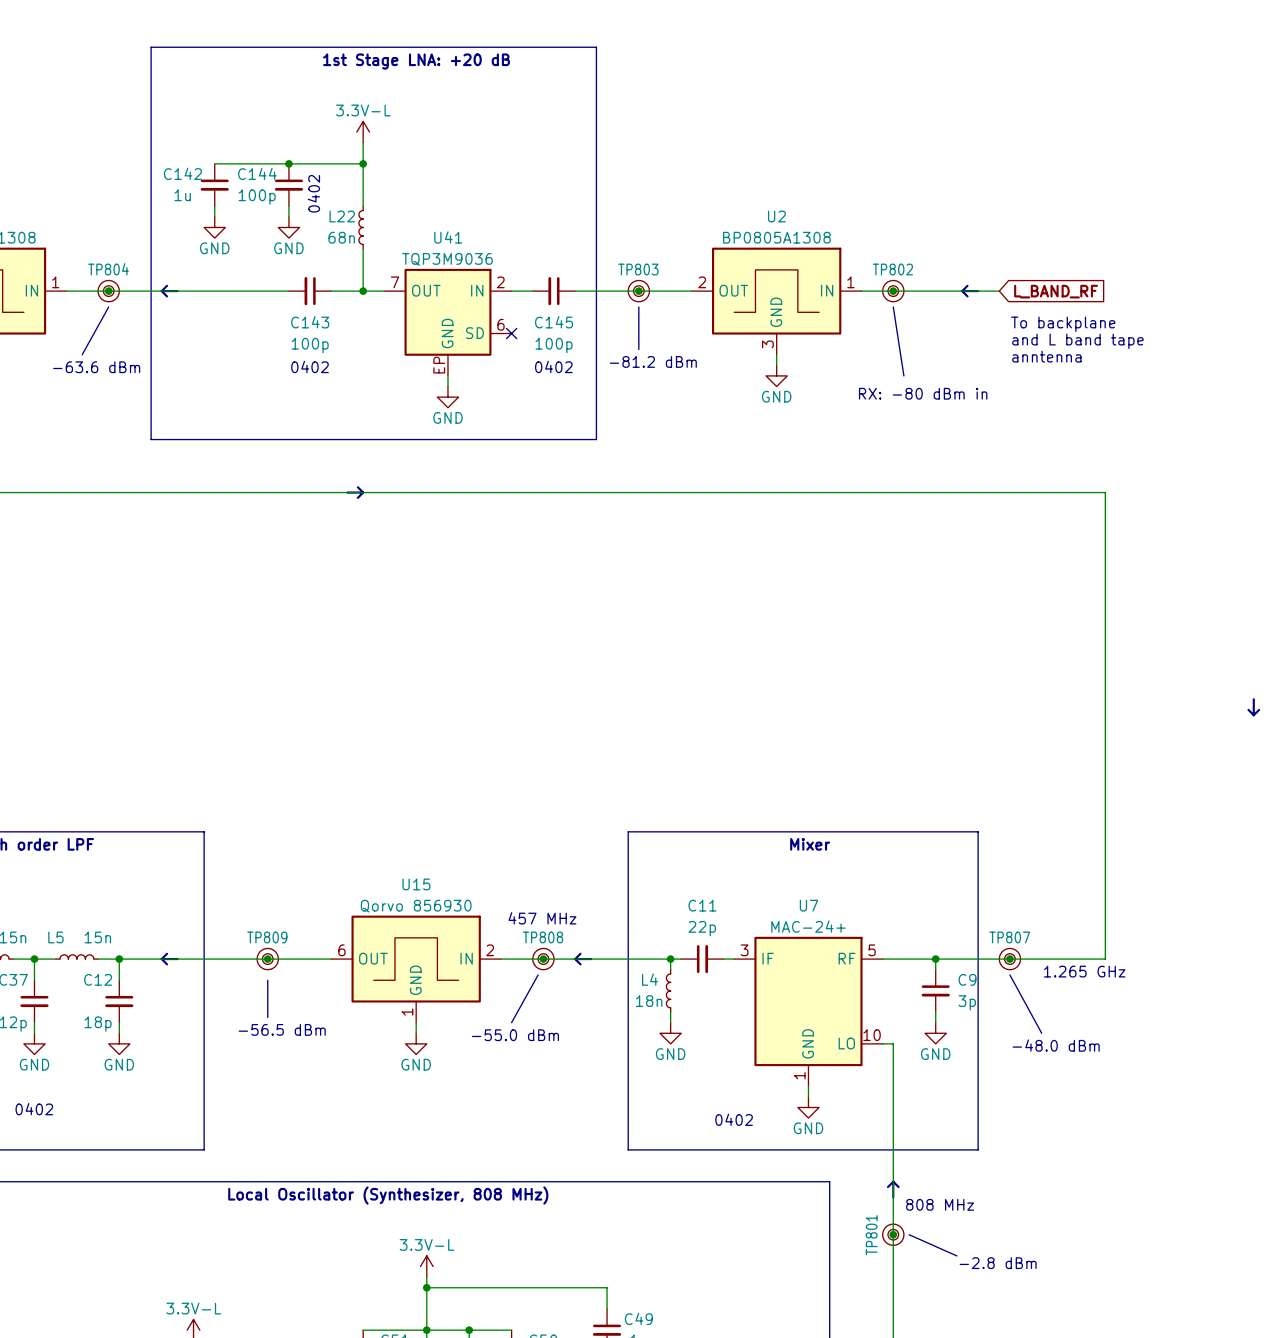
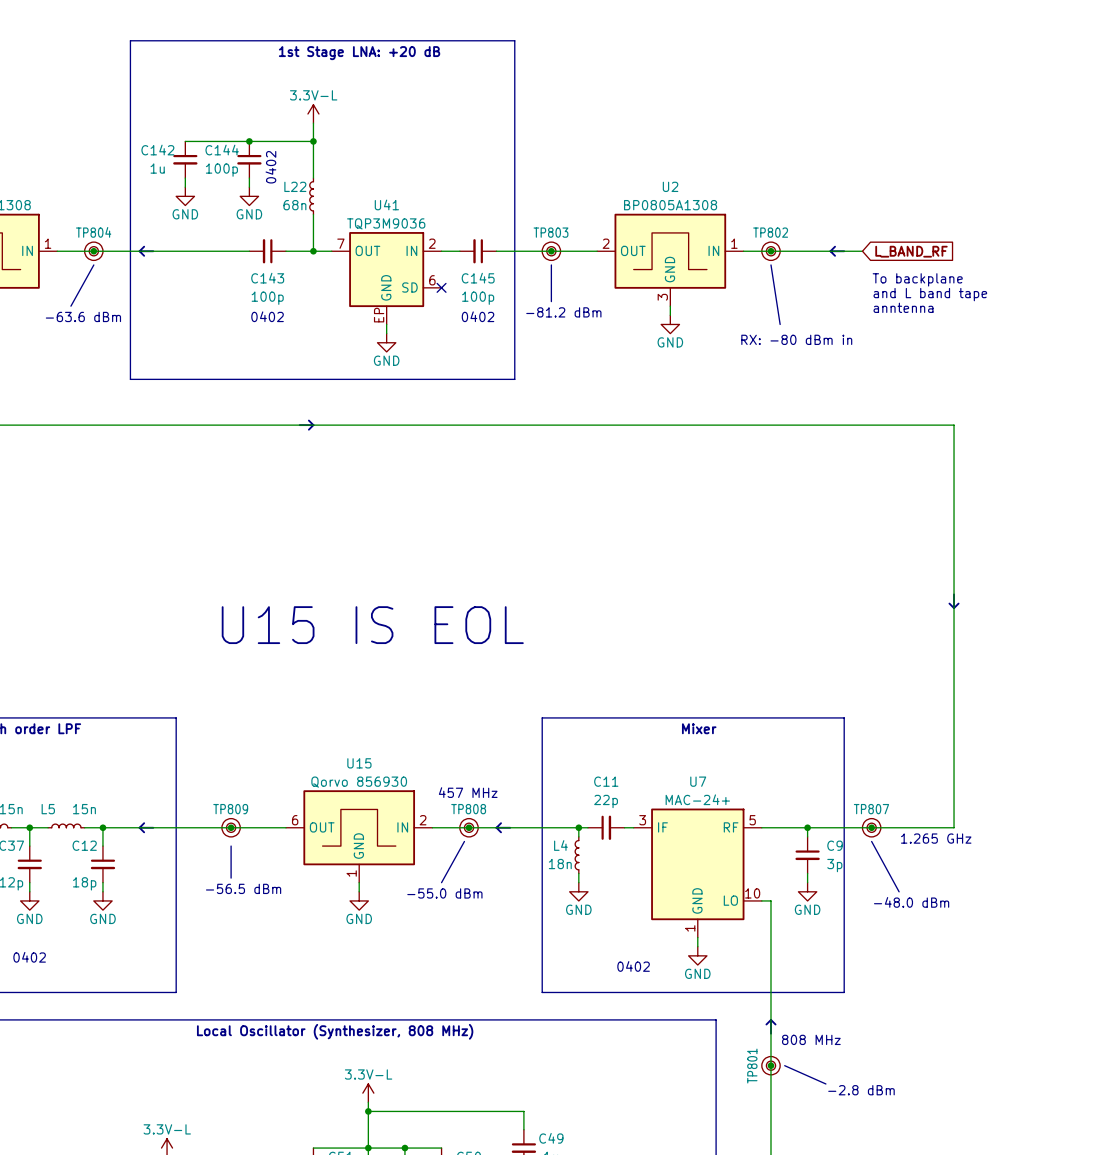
line: (1253, 699) (1253, 715) -> (954, 594) (954, 608)
line: (1248, 709) (1253, 715) -> (949, 603) (954, 608)
line: (1259, 709) (1253, 715) -> (958, 603) (954, 608)
text: none -> U15 IS EOL (372, 625)

